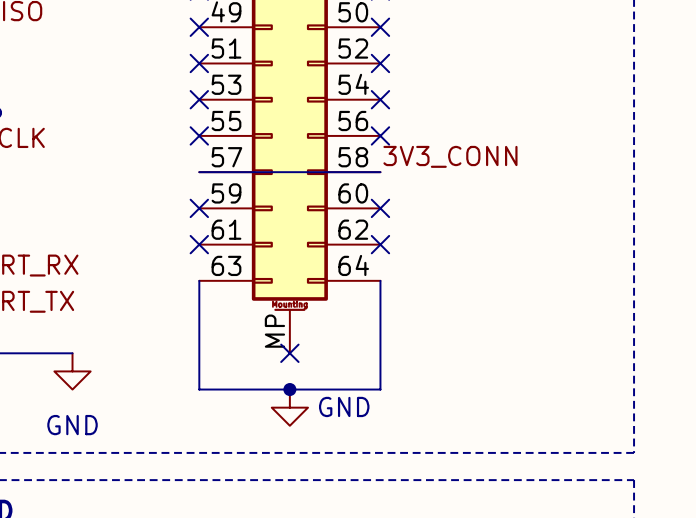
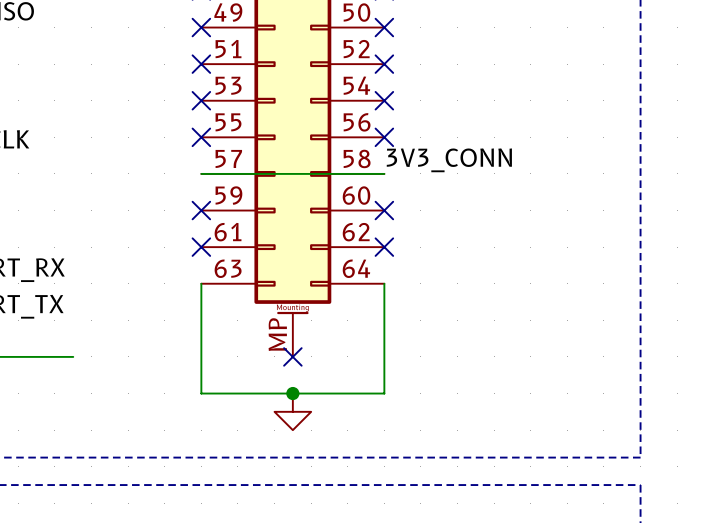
power symbol: GND (72, 371) -> none
power symbol text: GND (344, 406) -> none

